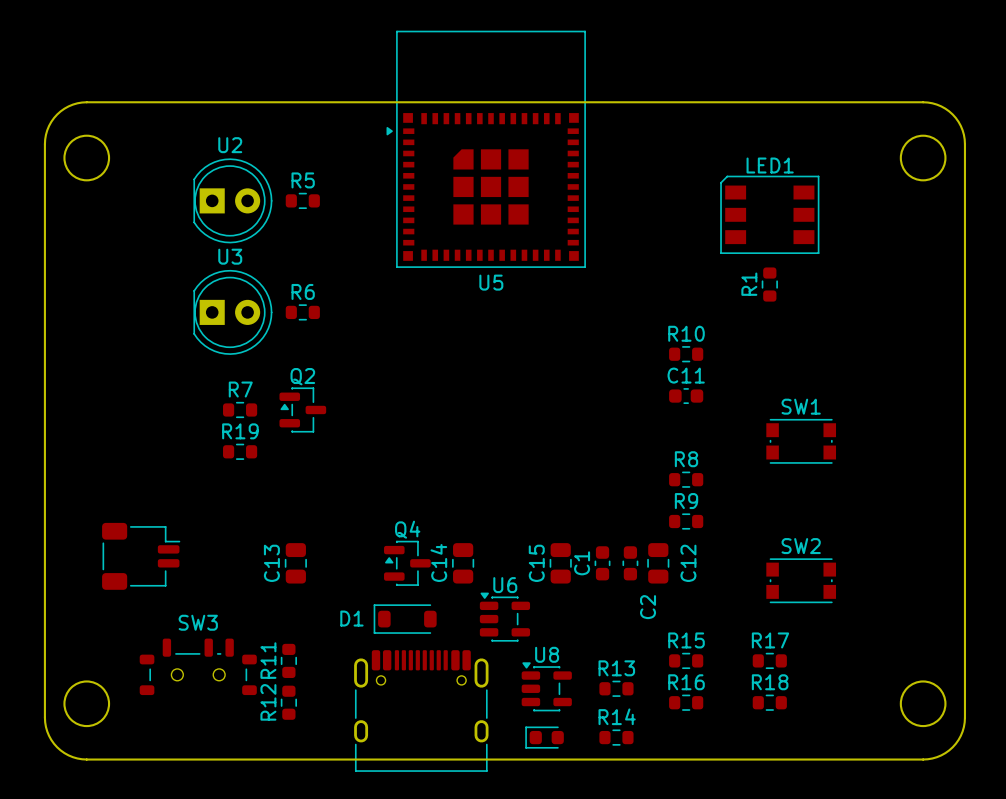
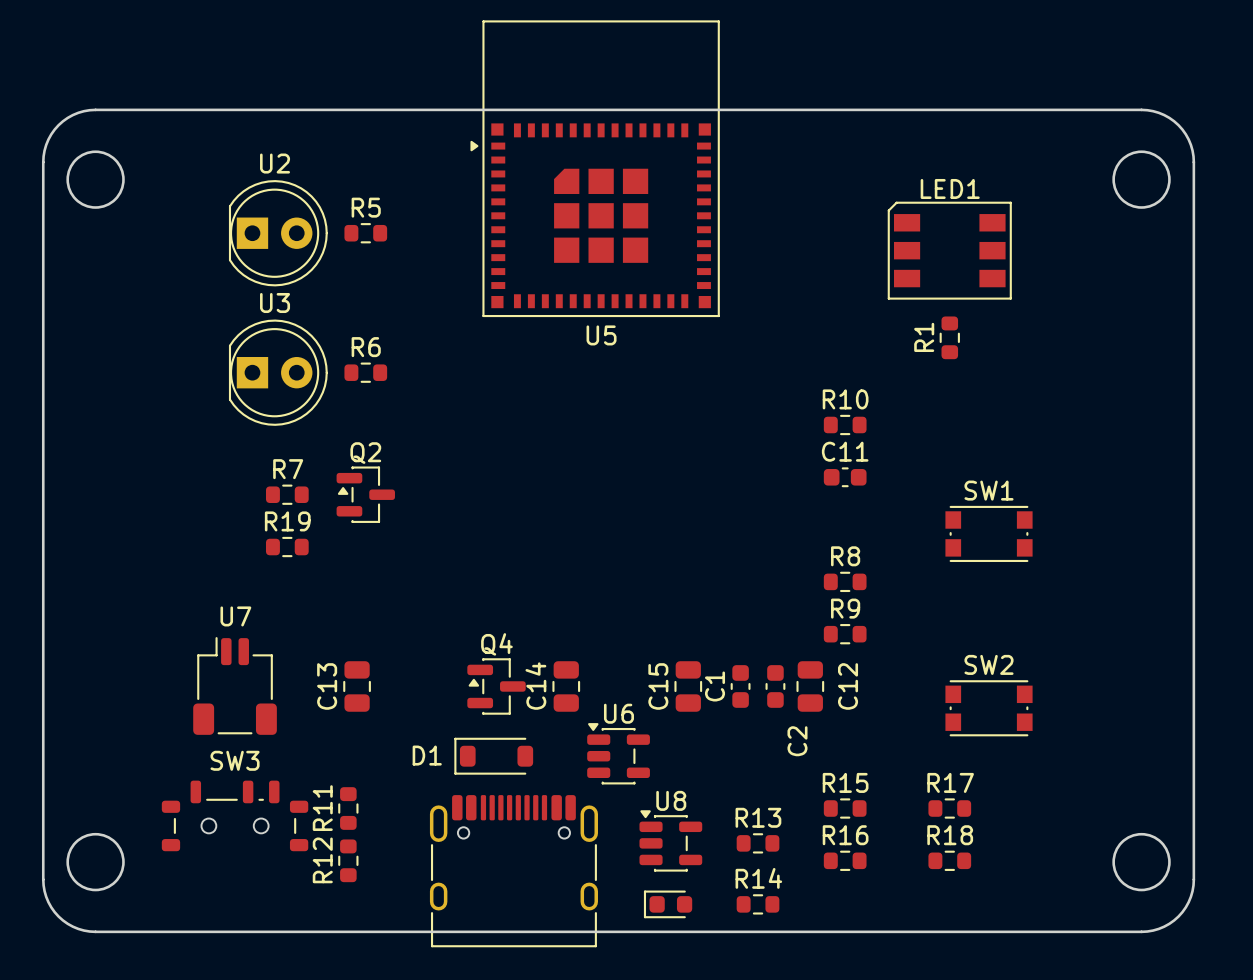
part: (141, 556) -> none
U7: none -> (235, 685)

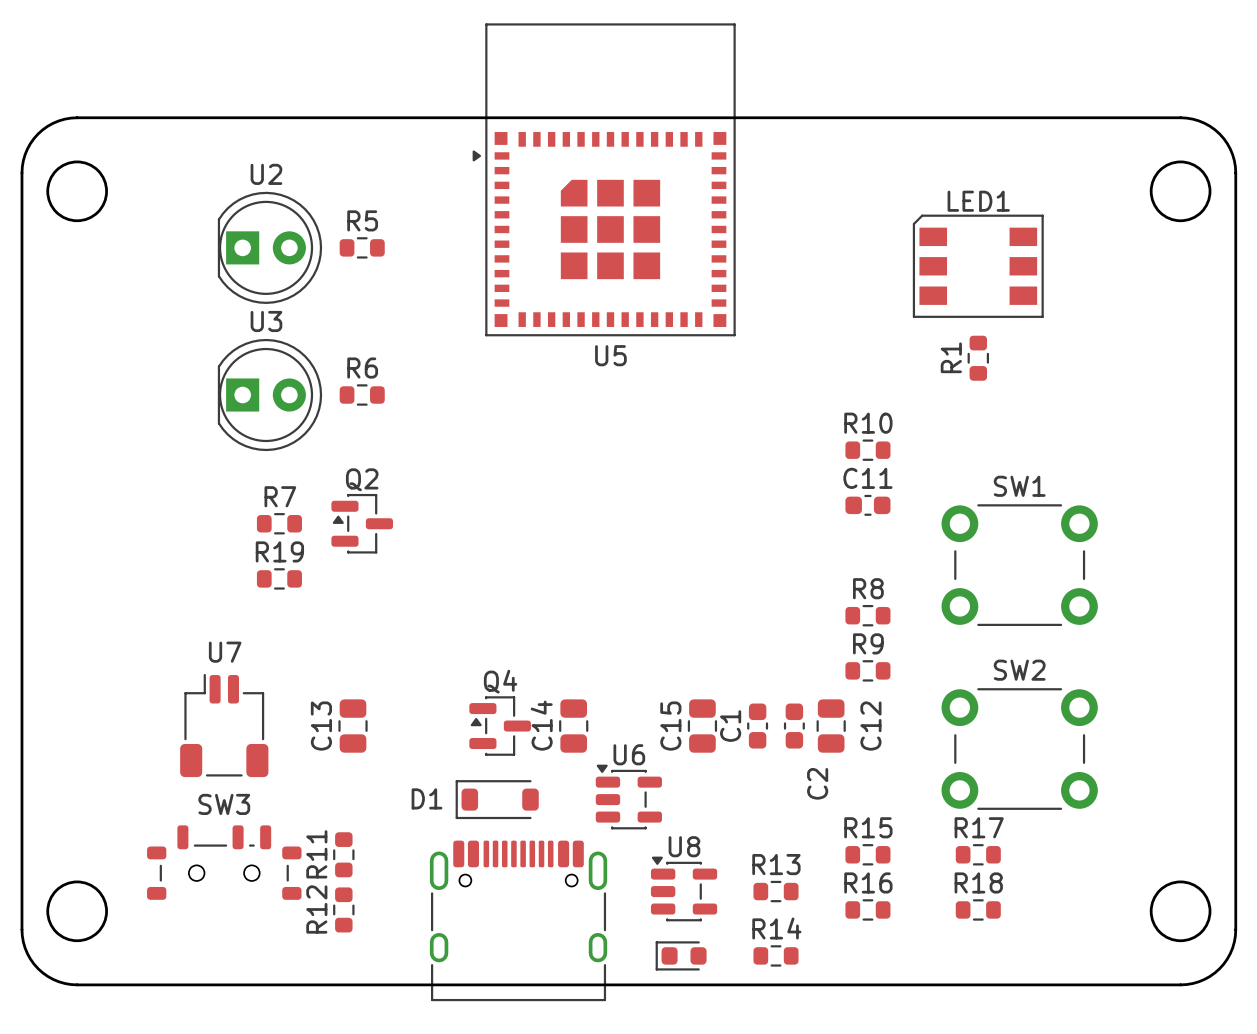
SW1 footprint: [945, 505, 1033, 563] -> [941, 504, 1098, 626]
SW2 footprint: [945, 680, 1033, 737] -> [941, 688, 1098, 810]

